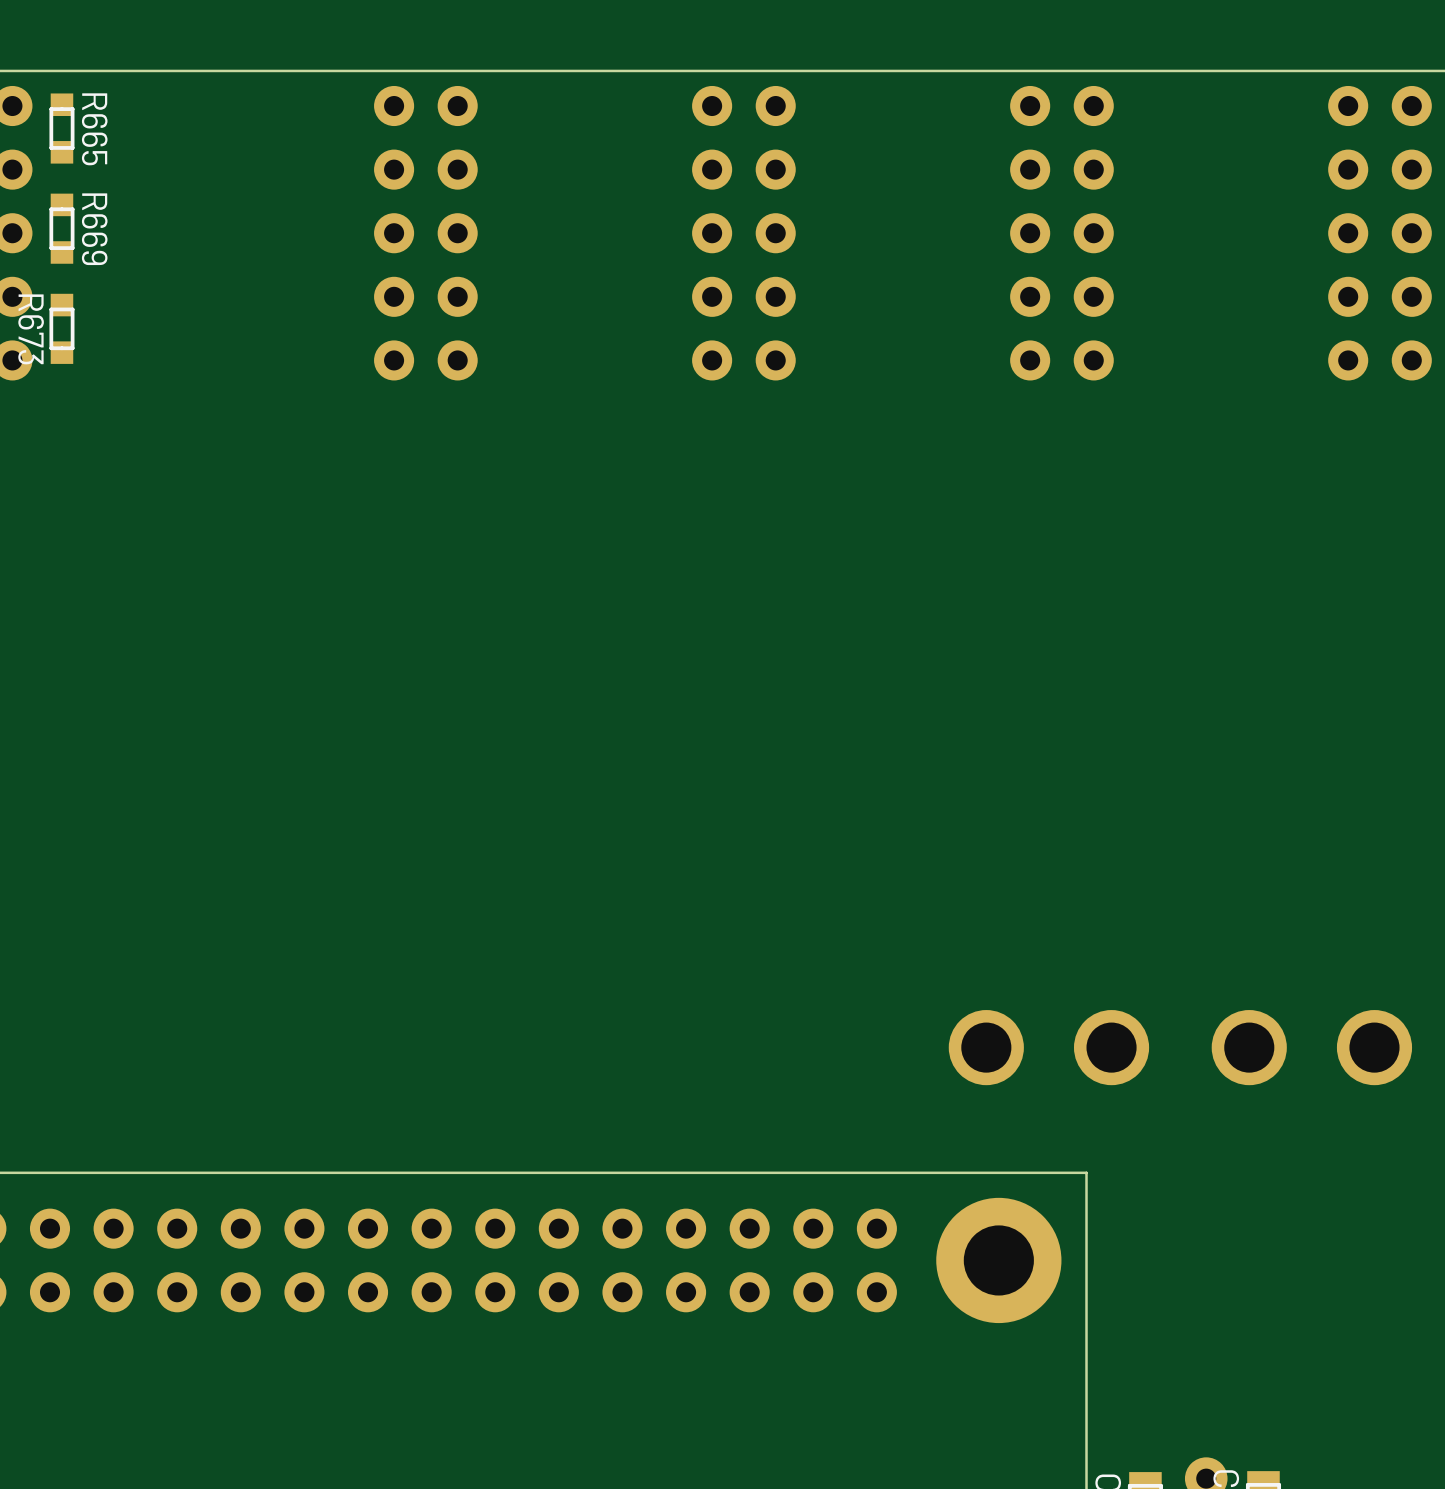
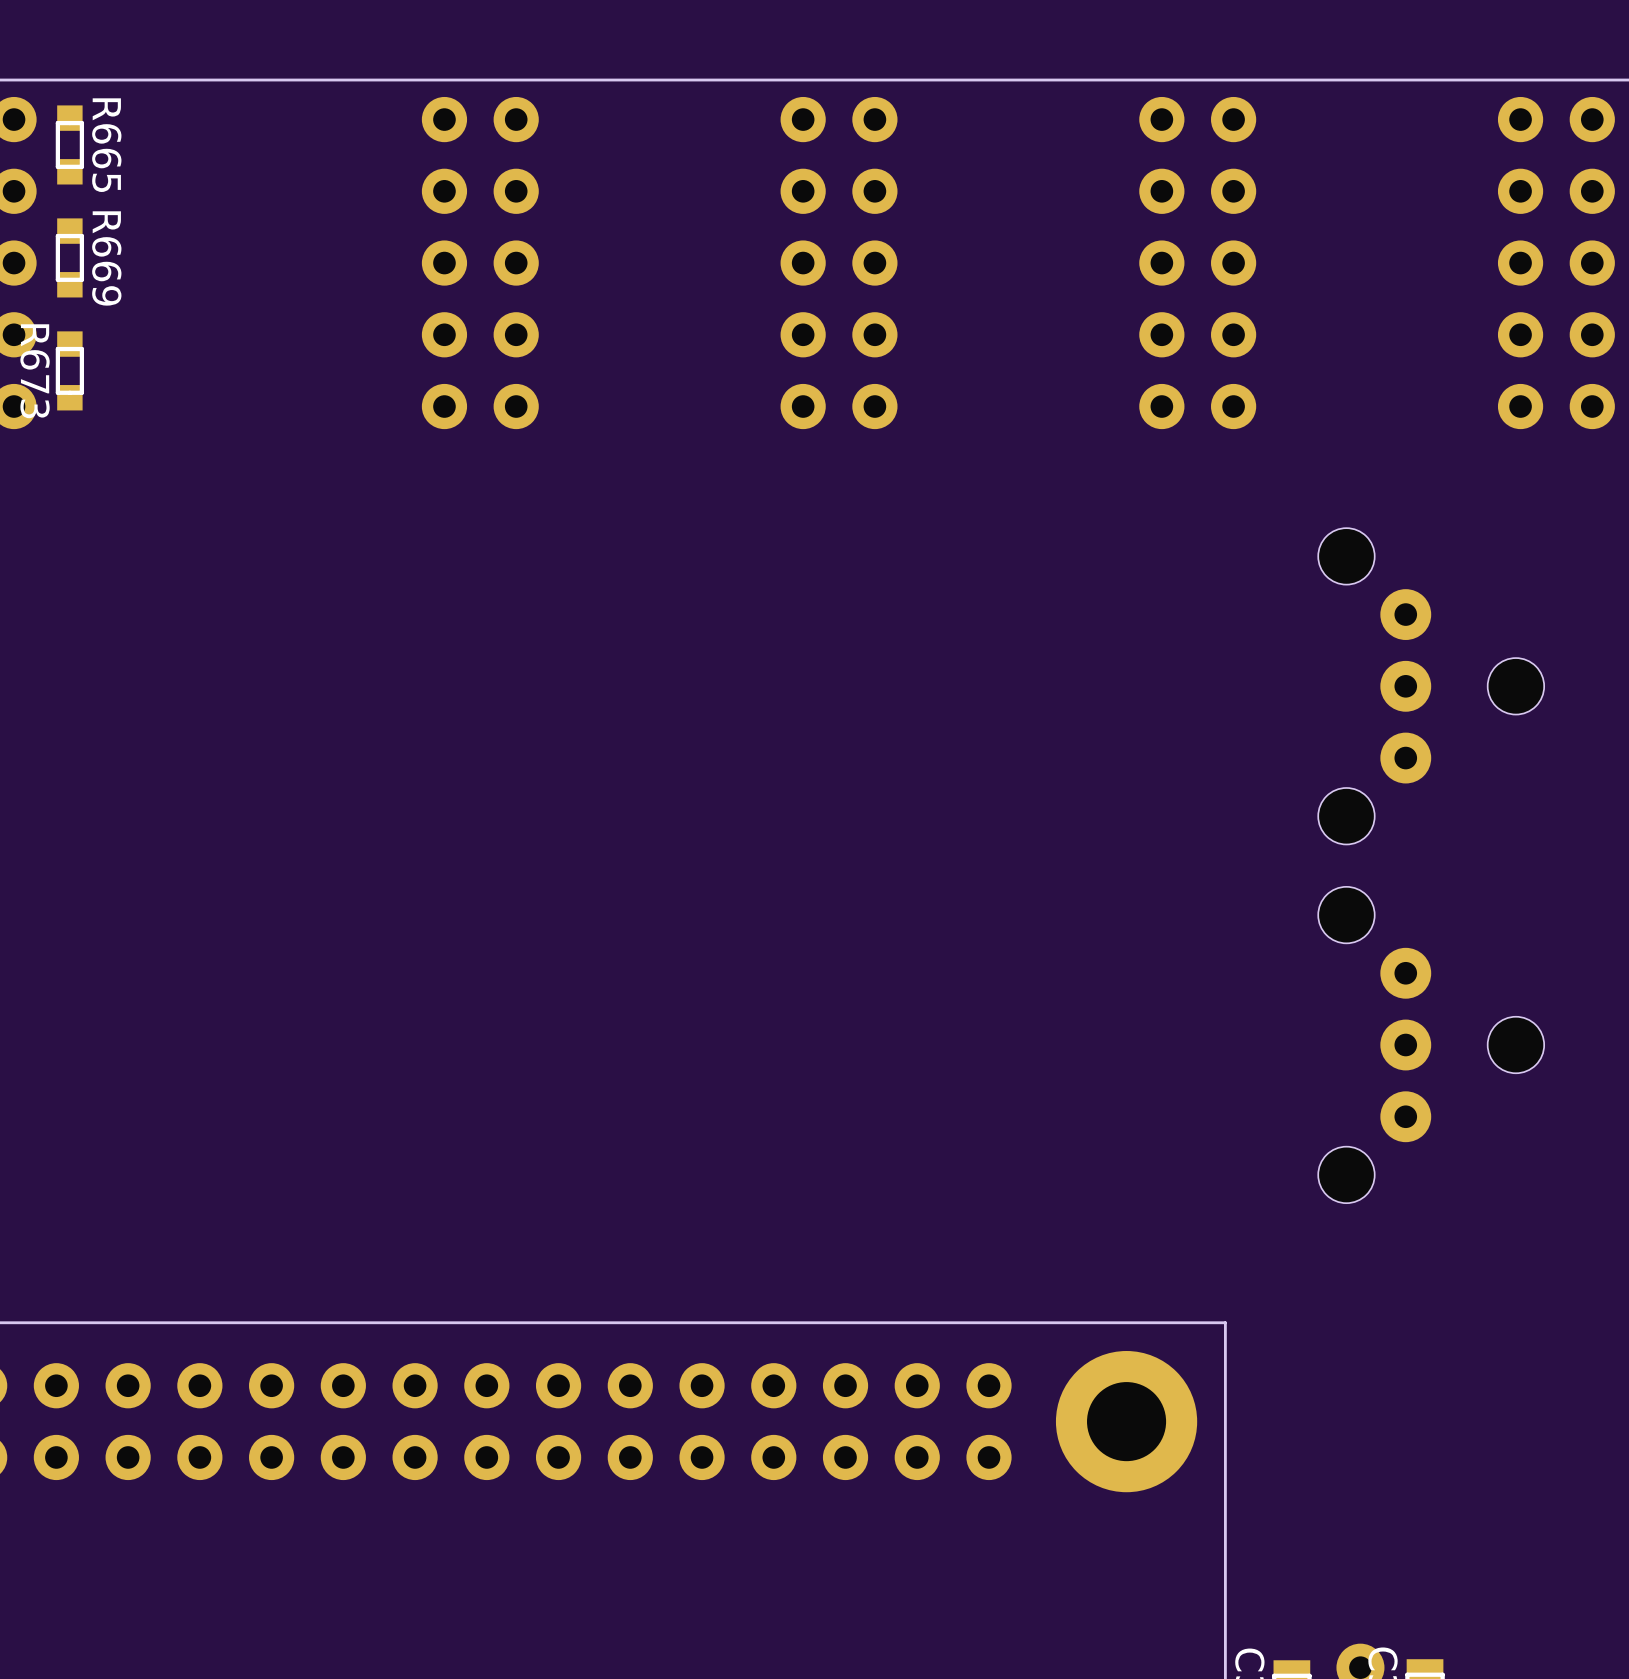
part: none -> (1431, 686)
part: none -> (1431, 1045)
part: (1048, 1047) -> none
part: (1311, 1047) -> none

